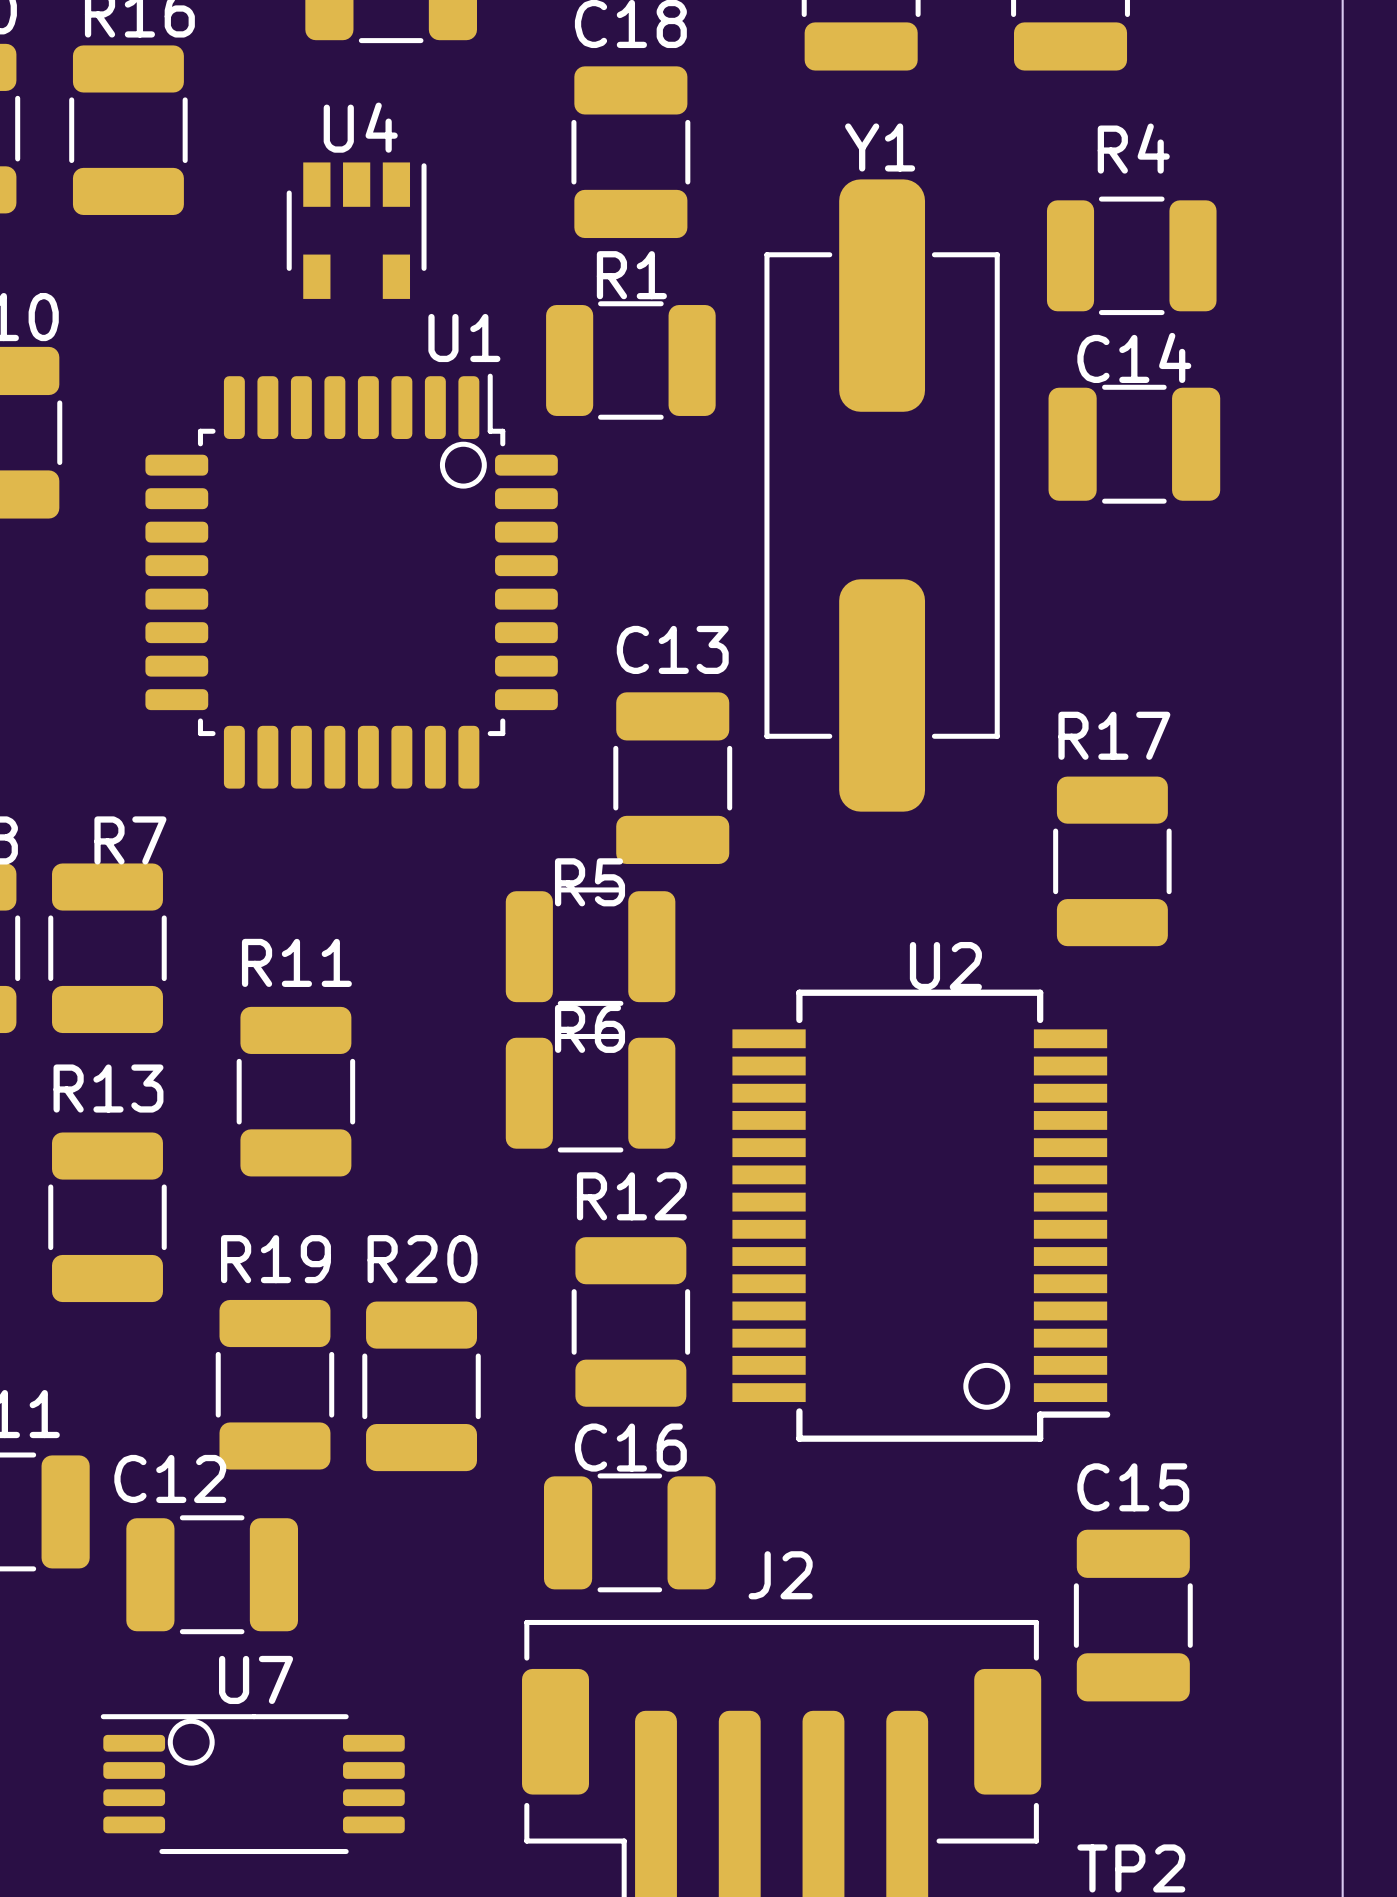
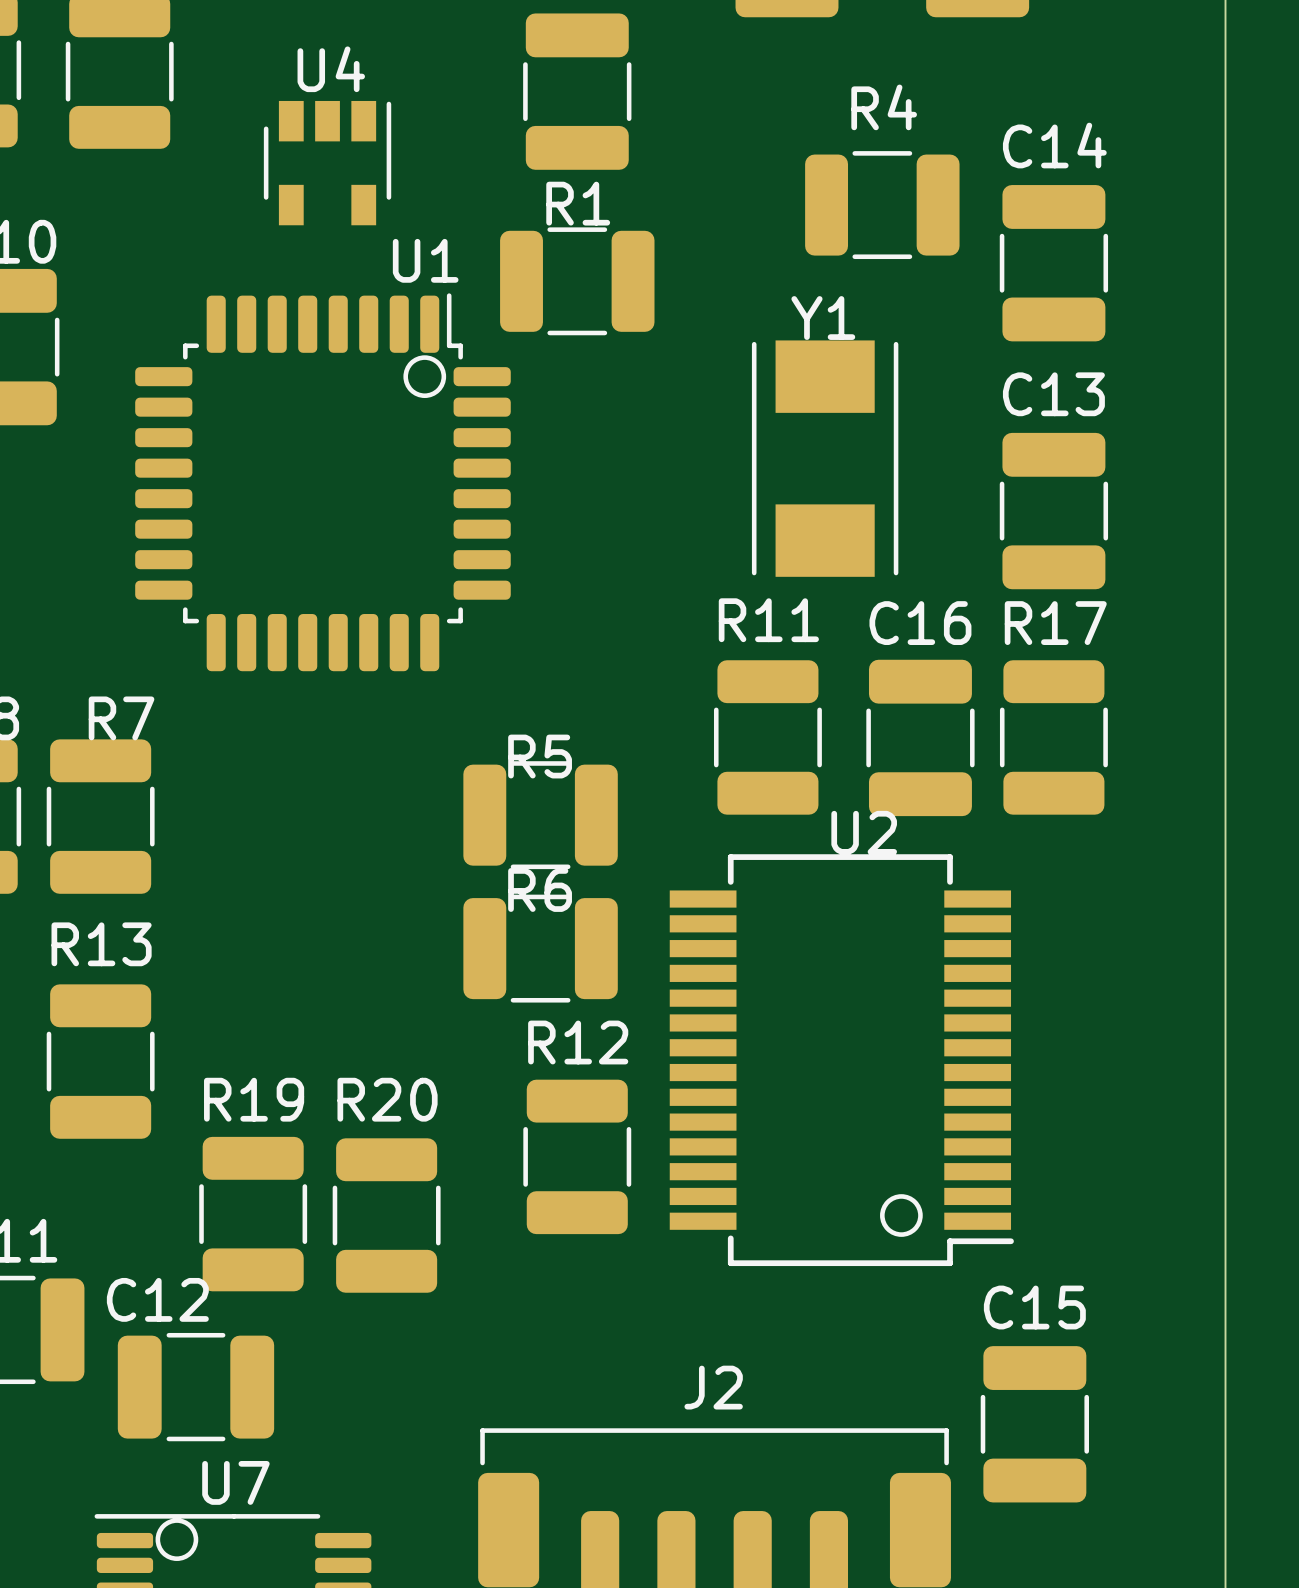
Y1 name position: Y1 (880, 147) -> Y1 (823, 318)
Y1 footprint: [764, 179, 1000, 812] -> [751, 340, 899, 577]
R4 position: (1131, 255) -> (882, 205)
C14 rotation: 0° (1134, 444) -> 90° clockwise (1053, 263)
C14 position: (1134, 444) -> (1053, 263)
C13 position: (672, 778) -> (1053, 511)
R17 position: (1112, 861) -> (1053, 737)
R11 position: (295, 1091) -> (767, 737)
C16 rotation: 0° (629, 1532) -> 90° clockwise (920, 737)
C16 position: (629, 1532) -> (920, 737)

